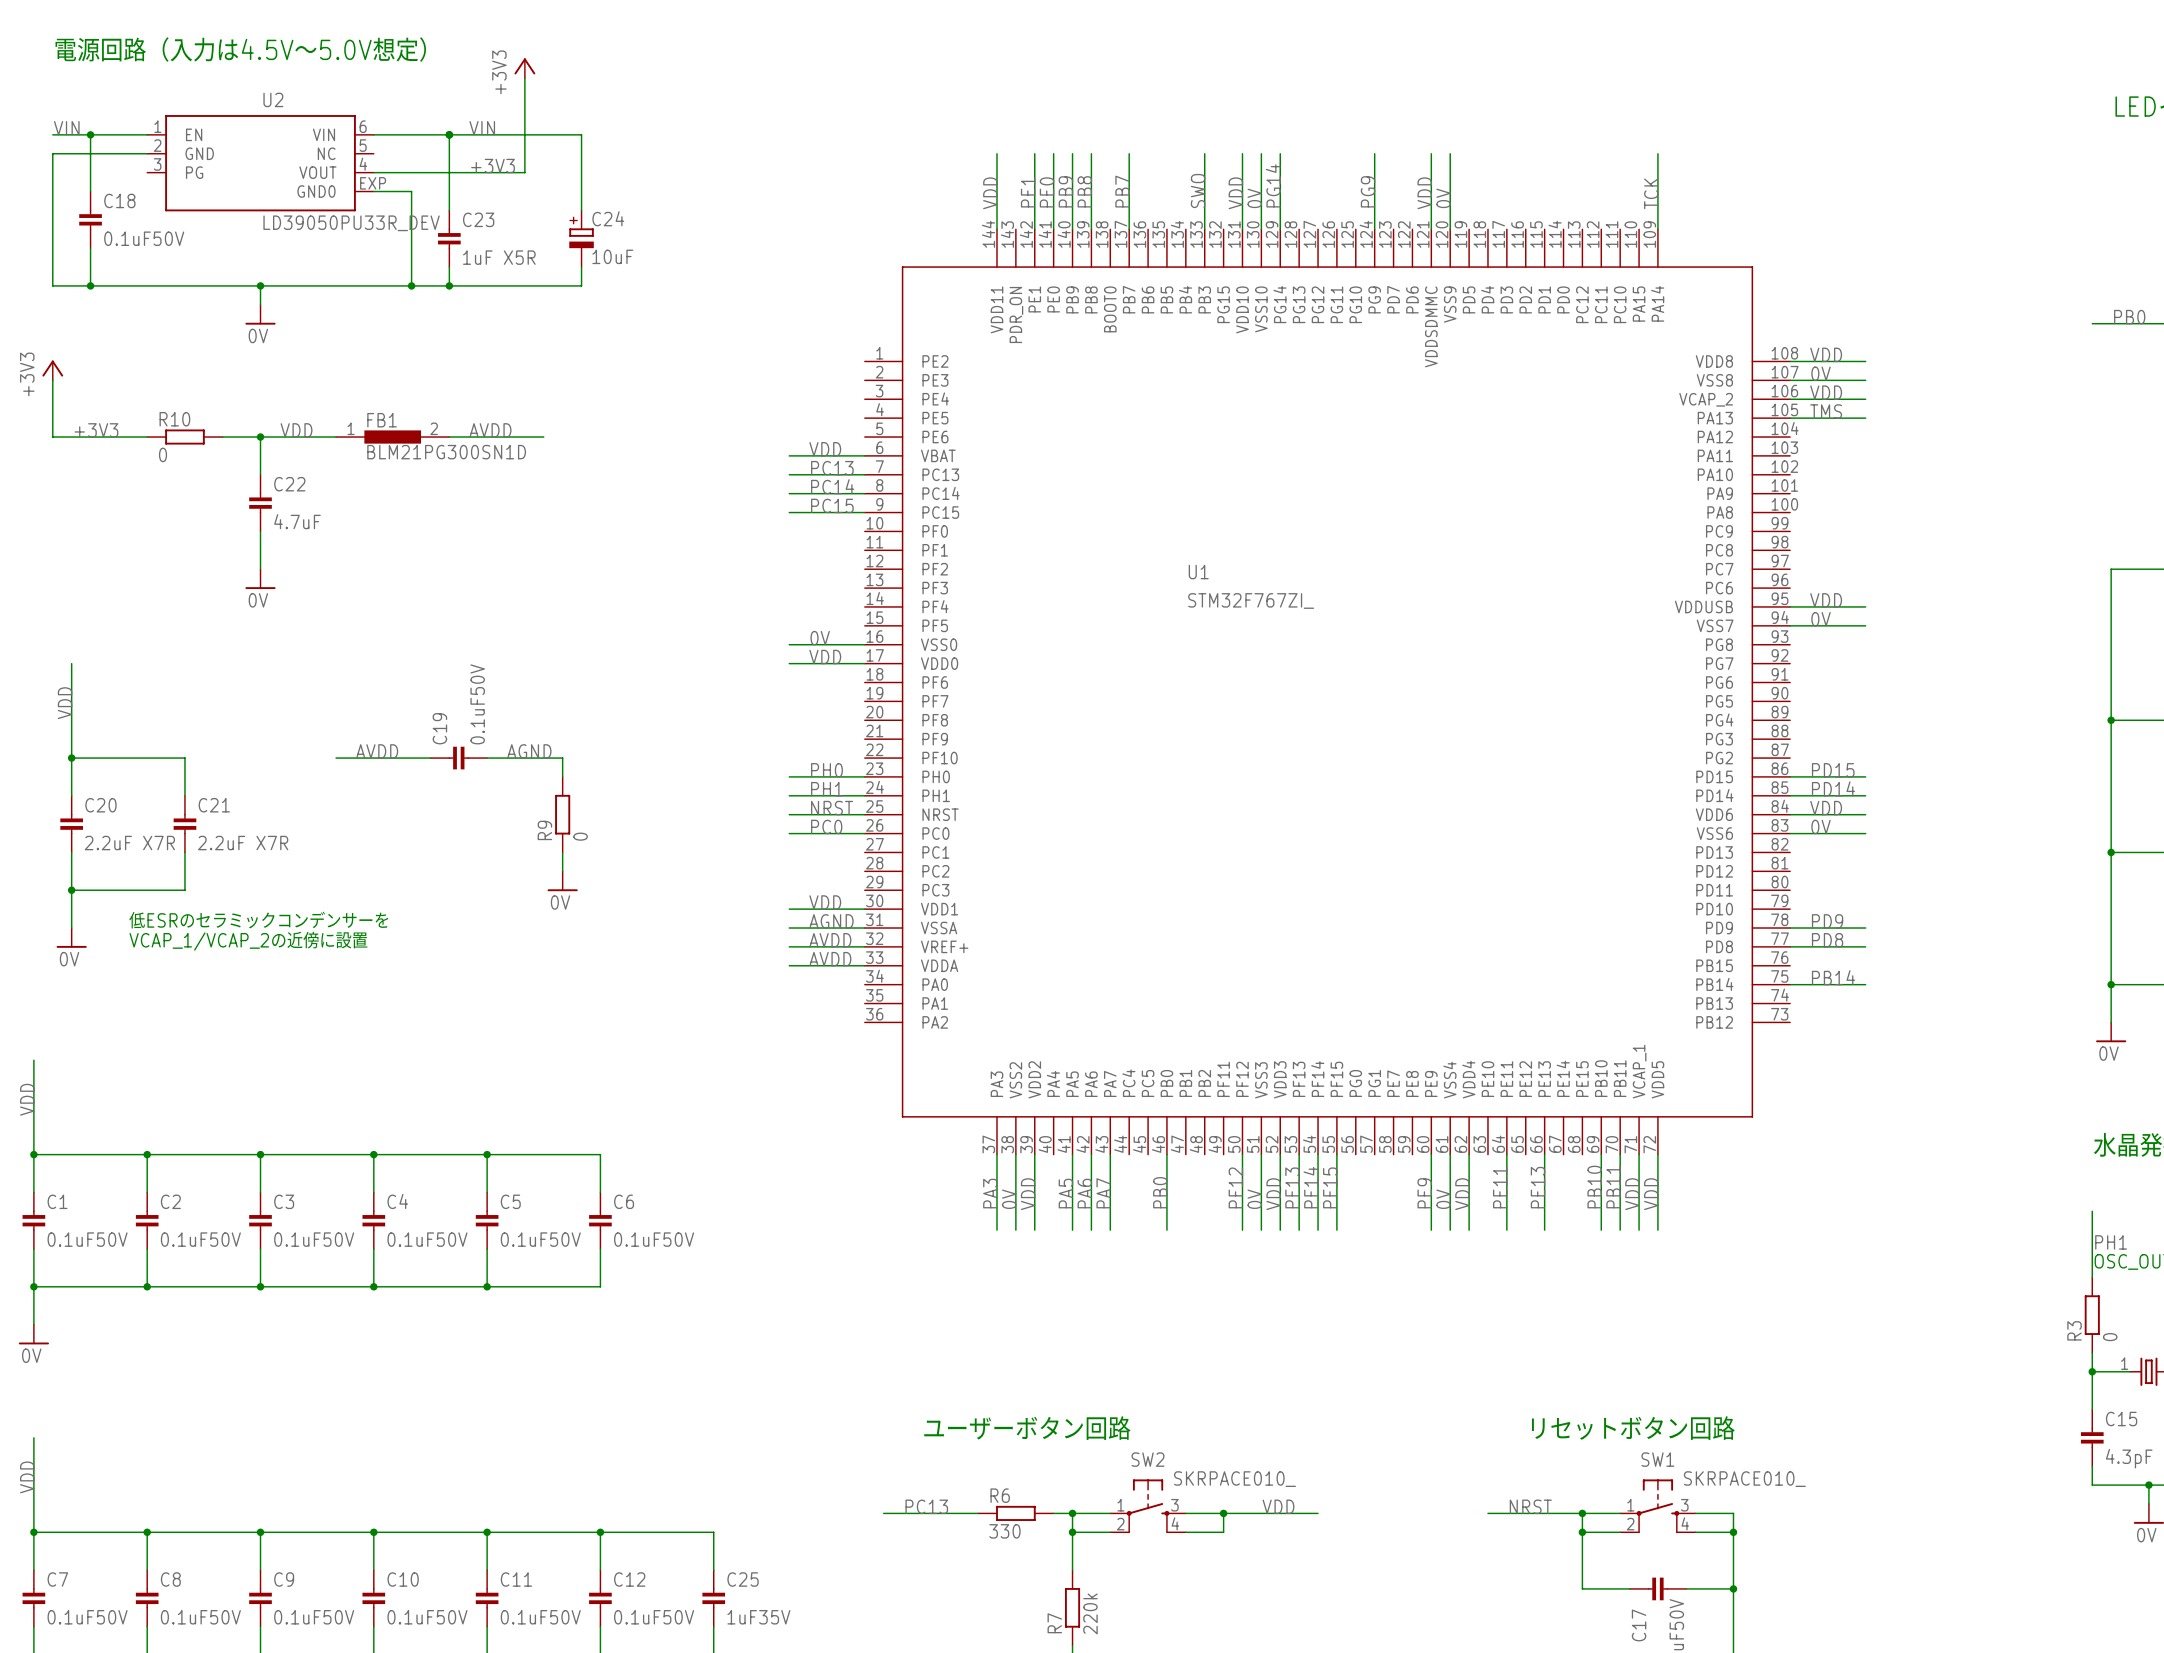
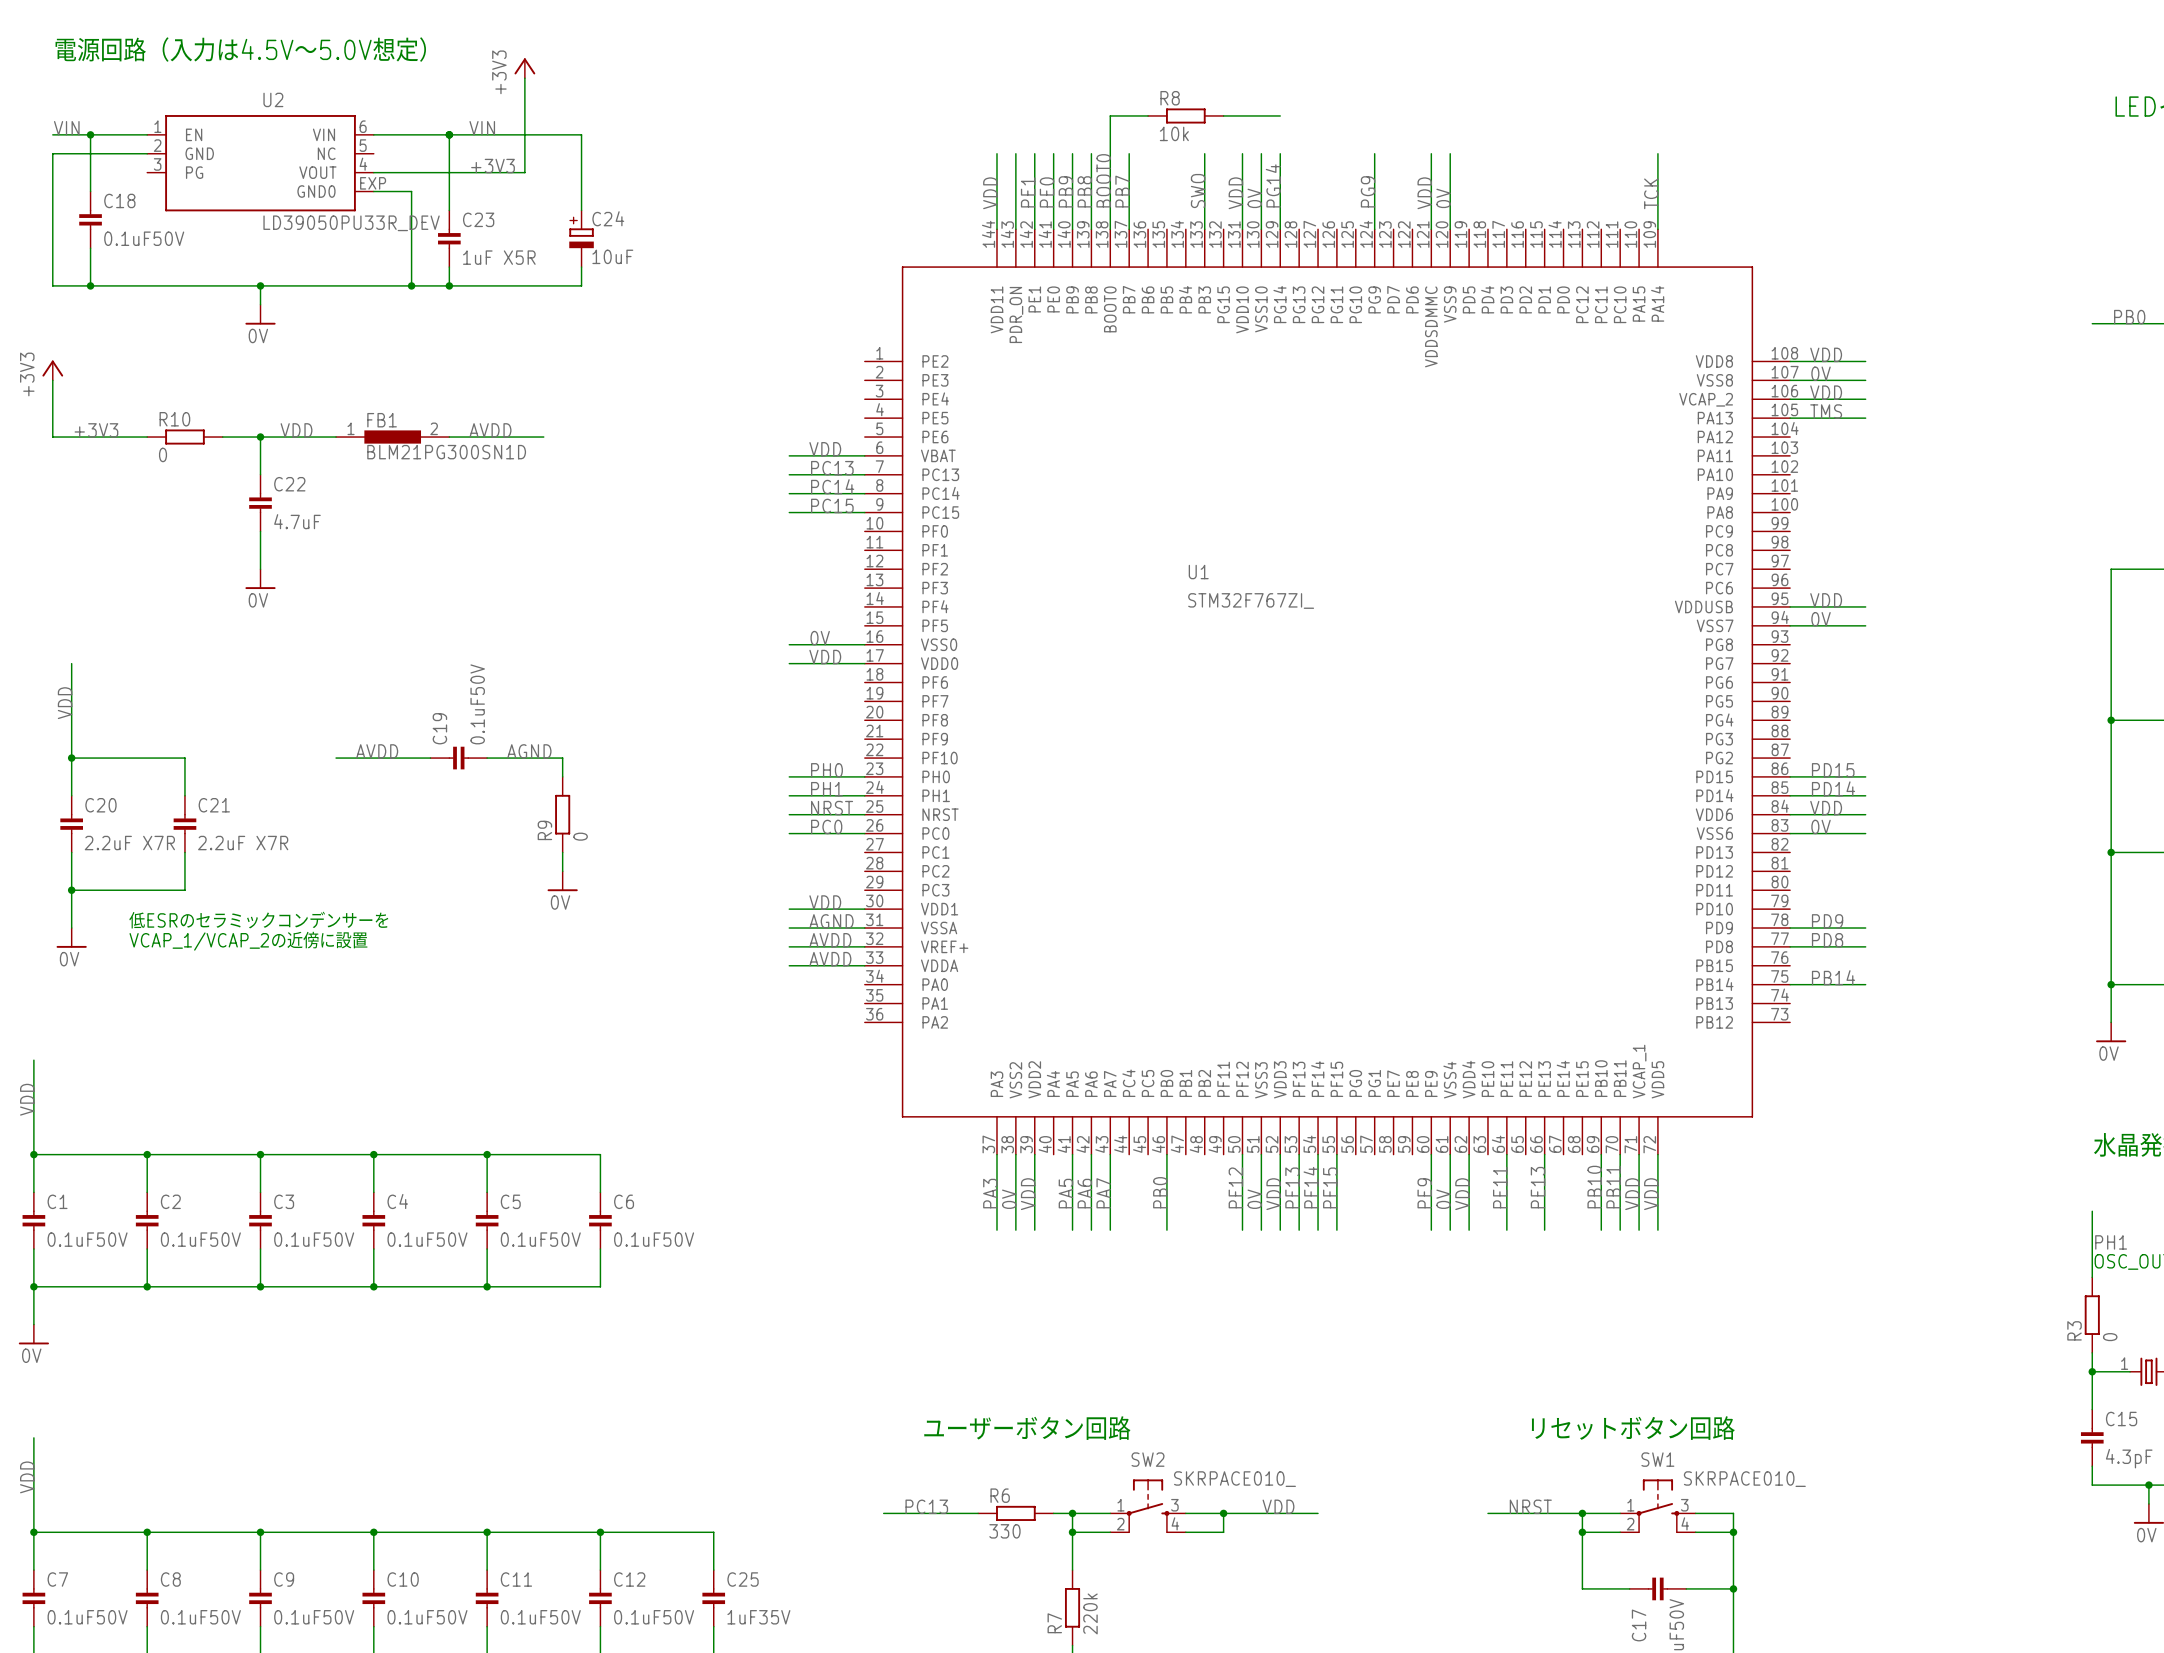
wire: none -> (1148, 115) (1110, 115) (1110, 229)
R8: none -> 10k (1185, 115)
wire: none -> (1223, 115) (1280, 115)
wire: none -> (1015, 153) (1015, 229)
label: none -> BOOT0 (1103, 180)

